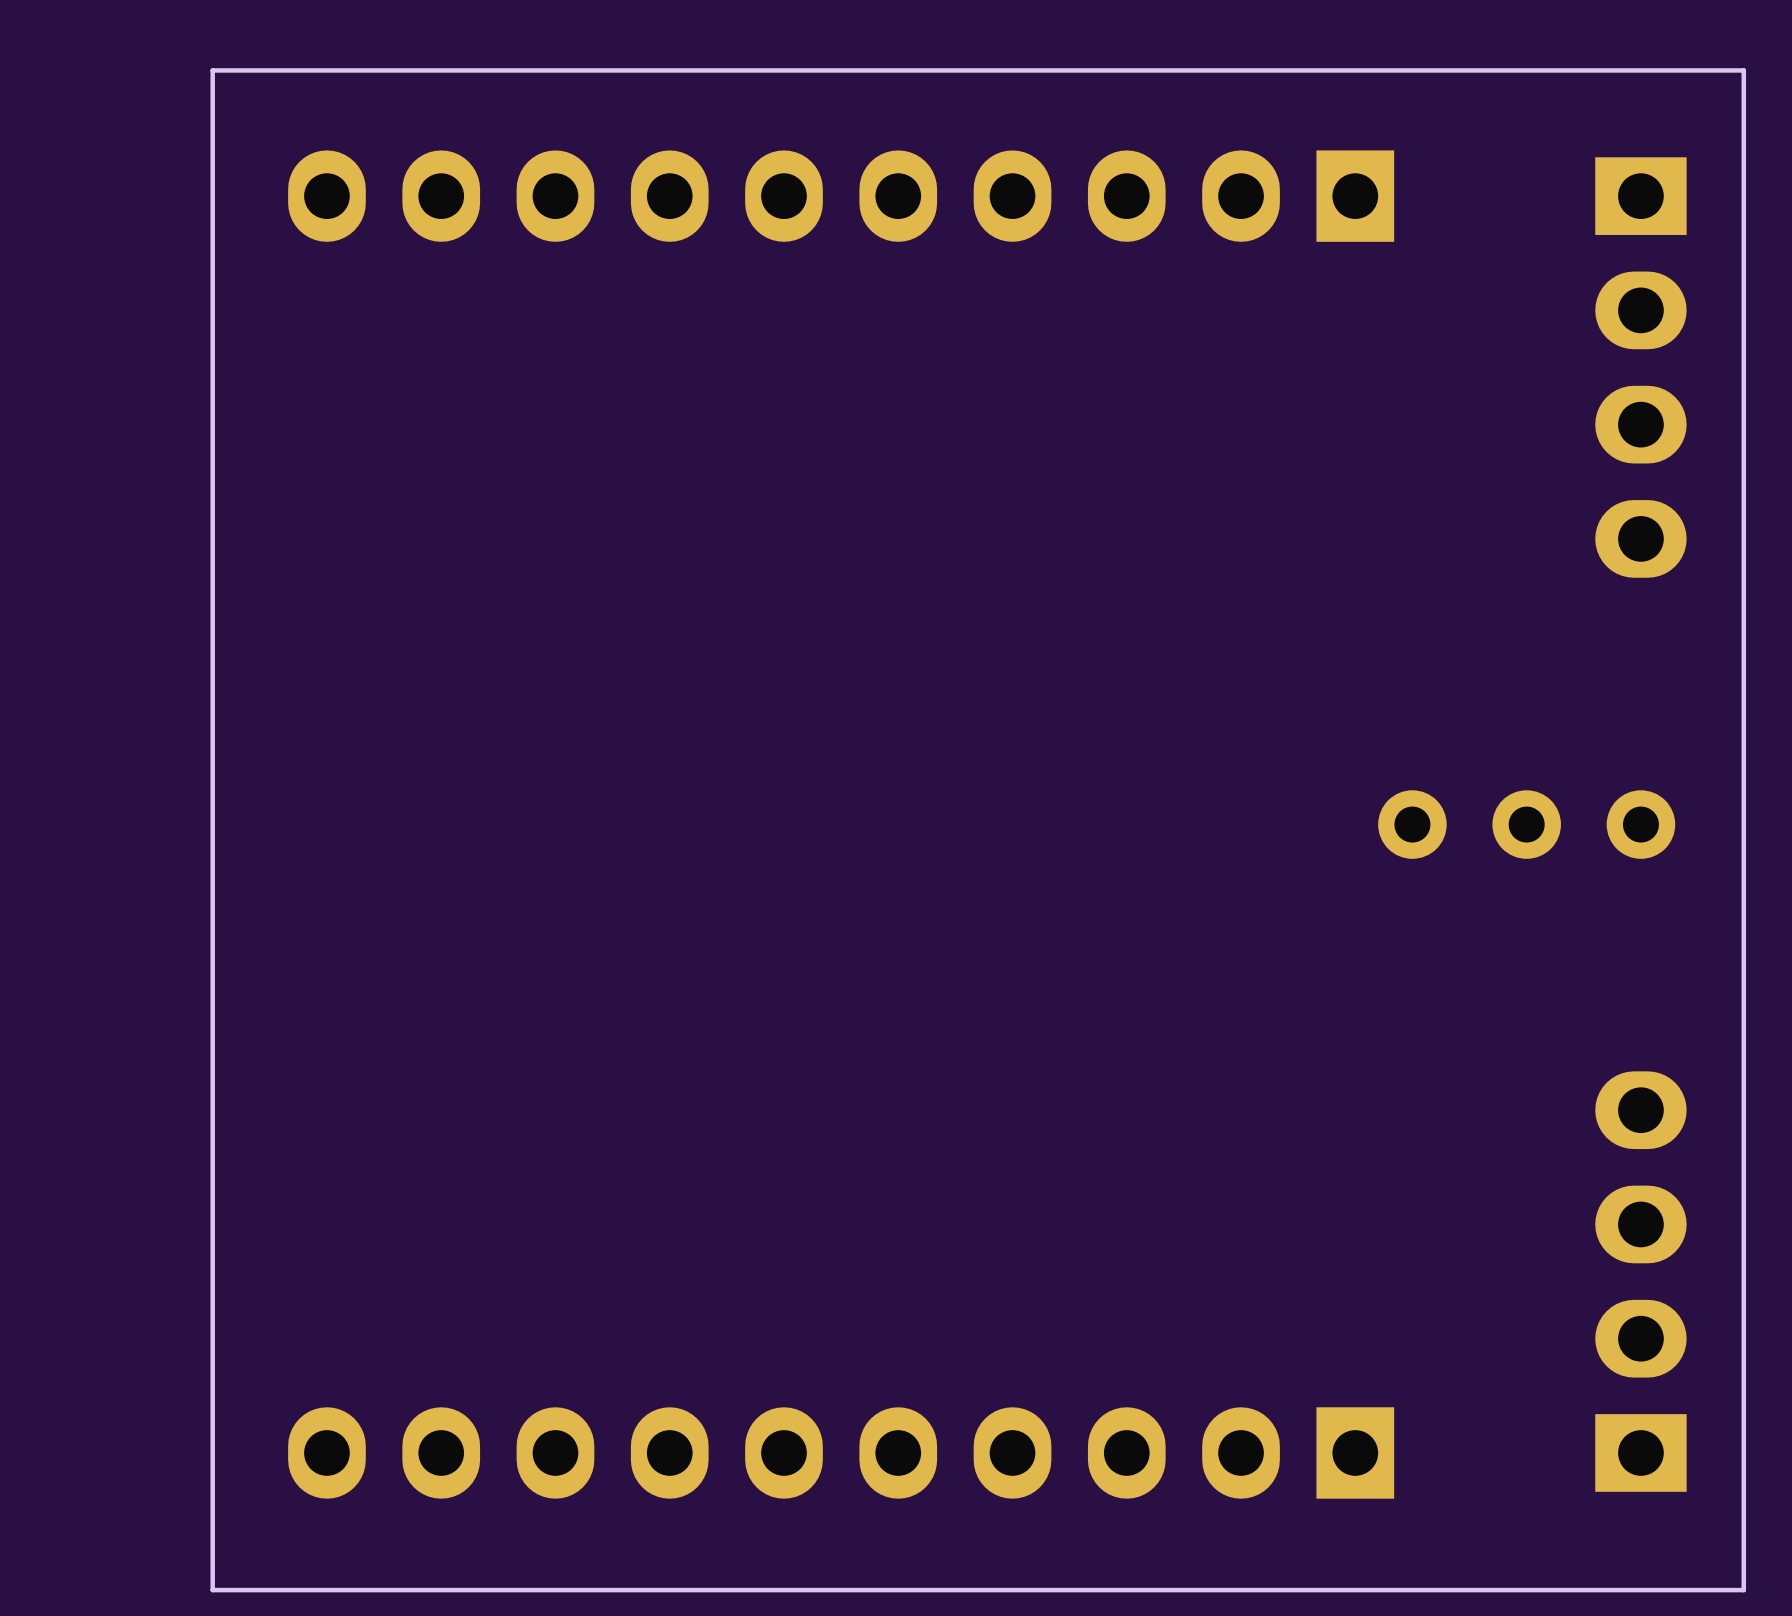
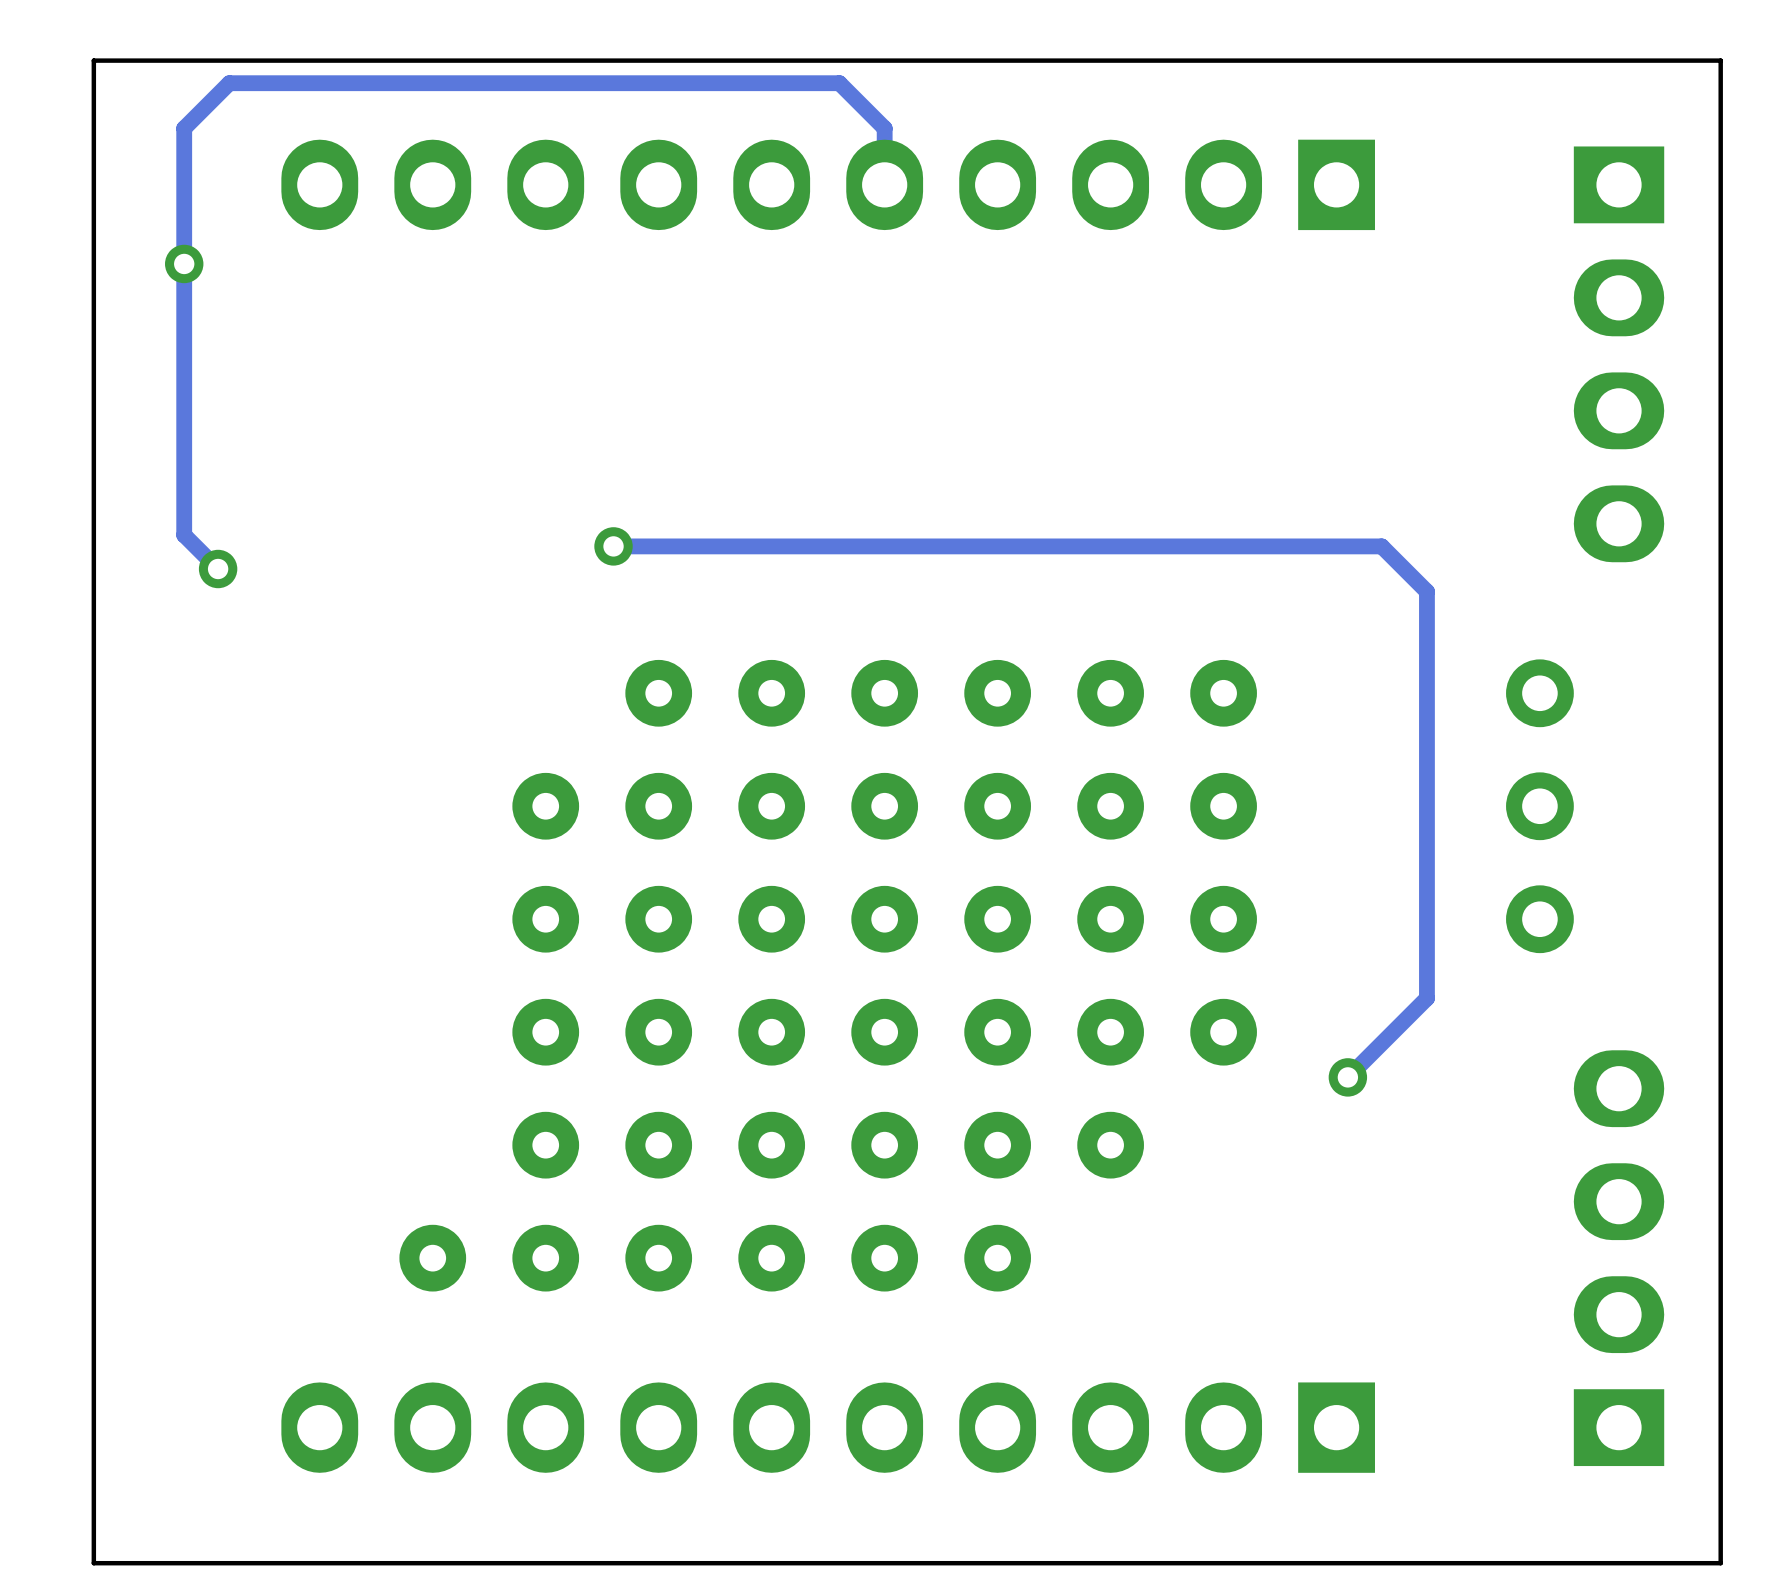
board edge: (212, 70) (212, 1590) -> (206, 60) (93, 60) (93, 1563) (206, 1563)
track: none -> (884, 184) (884, 128) (839, 83) (229, 83) (184, 128) (184, 535) (218, 569)
via: none -> (184, 263)
track: none -> (613, 546) (1381, 546) (1426, 591) (1426, 998) (1347, 1077)
via: none -> (613, 546)
via: none -> (218, 569)
part: none -> (658, 693)
part: none -> (771, 693)
part: none -> (884, 693)
part: none -> (997, 693)
part: none -> (1110, 693)
part: none -> (1223, 693)
part: none -> (545, 806)
part: none -> (658, 806)
part: none -> (771, 806)
part: none -> (884, 806)
part: none -> (997, 806)
part: none -> (1110, 806)
part: none -> (1223, 806)
part rotation: 0° (1526, 824) -> 90° clockwise (1539, 806)
part: none -> (545, 919)
part: none -> (658, 919)
part: none -> (771, 919)
part: none -> (884, 919)
part: none -> (997, 919)
part: none -> (1110, 919)
part: none -> (1223, 919)
part: none -> (545, 1032)
part: none -> (658, 1032)
part: none -> (771, 1032)
part: none -> (884, 1032)
part: none -> (997, 1032)
part: none -> (1110, 1032)
part: none -> (1223, 1032)
via: none -> (1347, 1077)
part: none -> (545, 1145)
part: none -> (658, 1145)
part: none -> (771, 1145)
part: none -> (884, 1145)
part: none -> (997, 1145)
part: none -> (1110, 1145)
part: none -> (432, 1258)
part: none -> (545, 1258)
part: none -> (658, 1258)
part: none -> (771, 1258)
part: none -> (884, 1258)
part: none -> (997, 1258)

